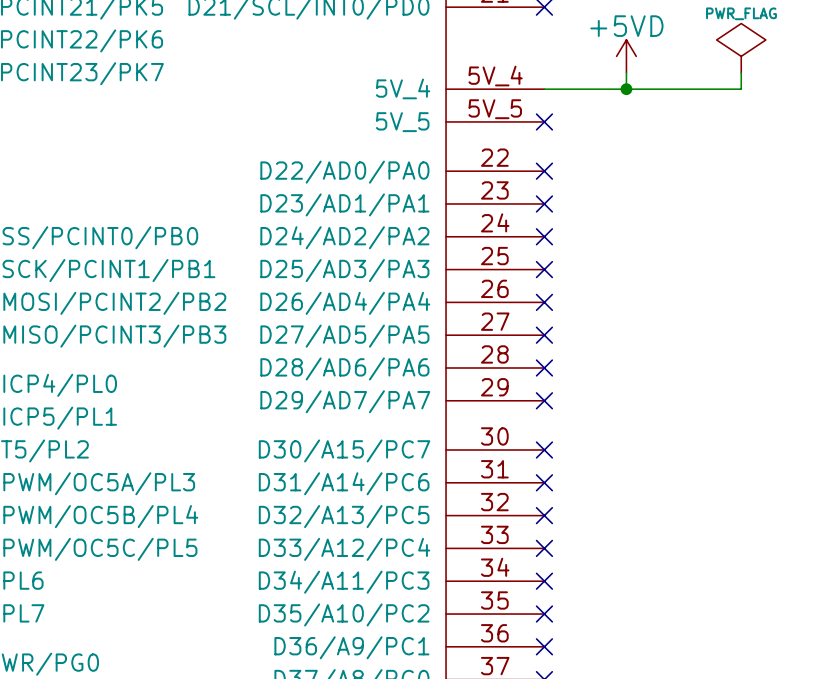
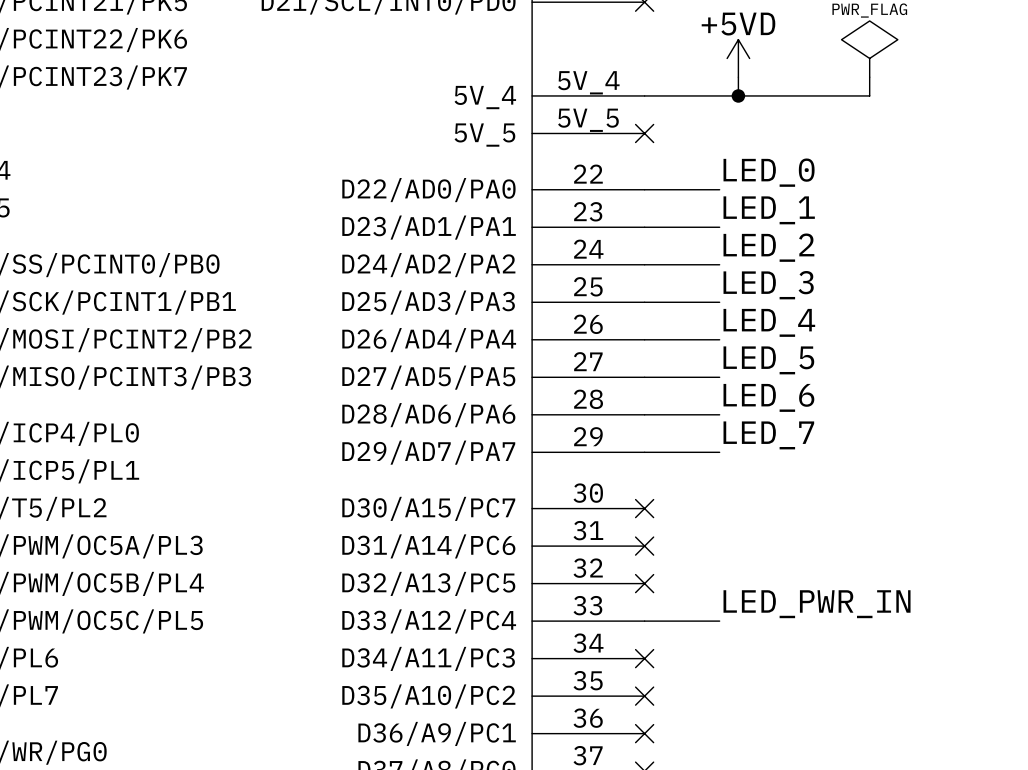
label: none -> LED_0 (769, 172)
wire: none -> (644, 189) (719, 189)
no-connect mark: (544, 171) -> none
label: none -> LED_1 (769, 210)
wire: none -> (644, 227) (719, 227)
no-connect mark: (544, 203) -> none
label: none -> LED_2 (768, 247)
wire: none -> (644, 264) (719, 264)
no-connect mark: (544, 236) -> none
label: none -> LED_3 (768, 285)
wire: none -> (644, 302) (719, 302)
no-connect mark: (544, 269) -> none
label: none -> LED_4 (769, 322)
wire: none -> (644, 339) (719, 339)
no-connect mark: (544, 302) -> none
label: none -> LED_5 (768, 360)
wire: none -> (644, 377) (719, 377)
no-connect mark: (544, 335) -> none
label: none -> LED_6 (768, 397)
wire: none -> (644, 414) (719, 414)
no-connect mark: (544, 367) -> none
label: none -> LED_7 (768, 435)
wire: none -> (644, 452) (719, 452)
no-connect mark: (544, 400) -> none
label: none -> LED_PWR_IN (817, 604)
wire: none -> (644, 621) (719, 621)
no-connect mark: (544, 548) -> none

